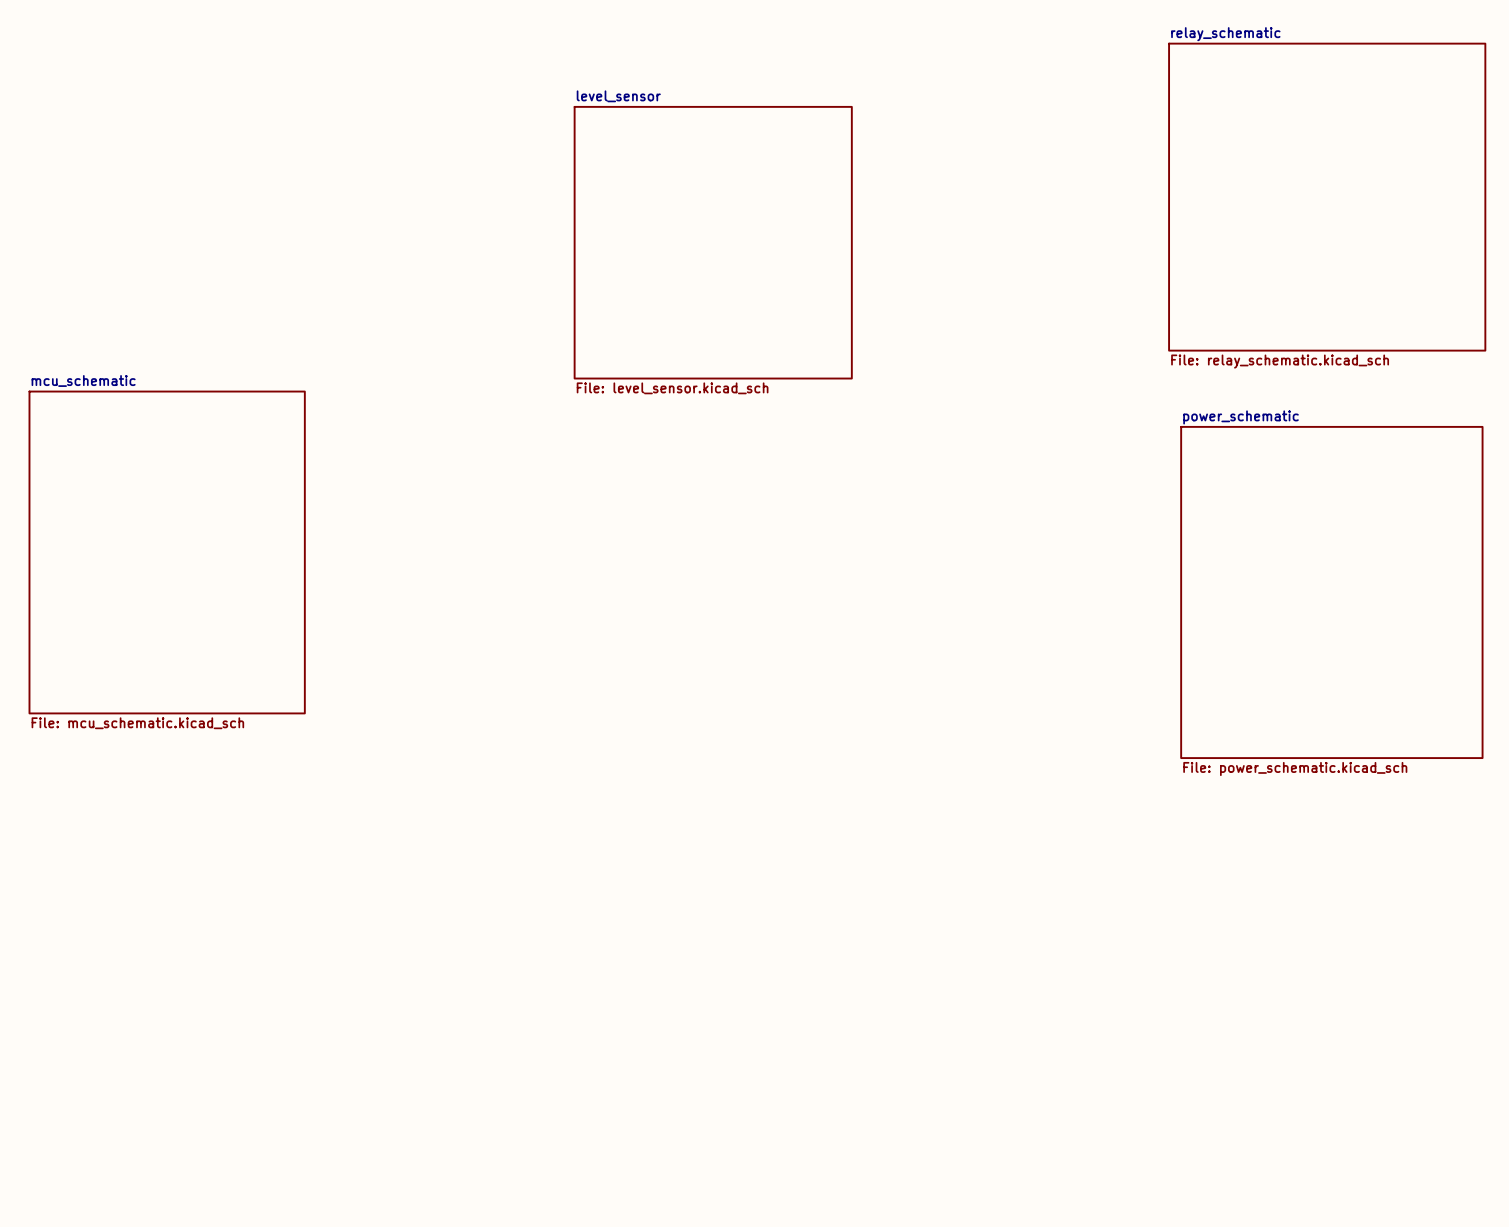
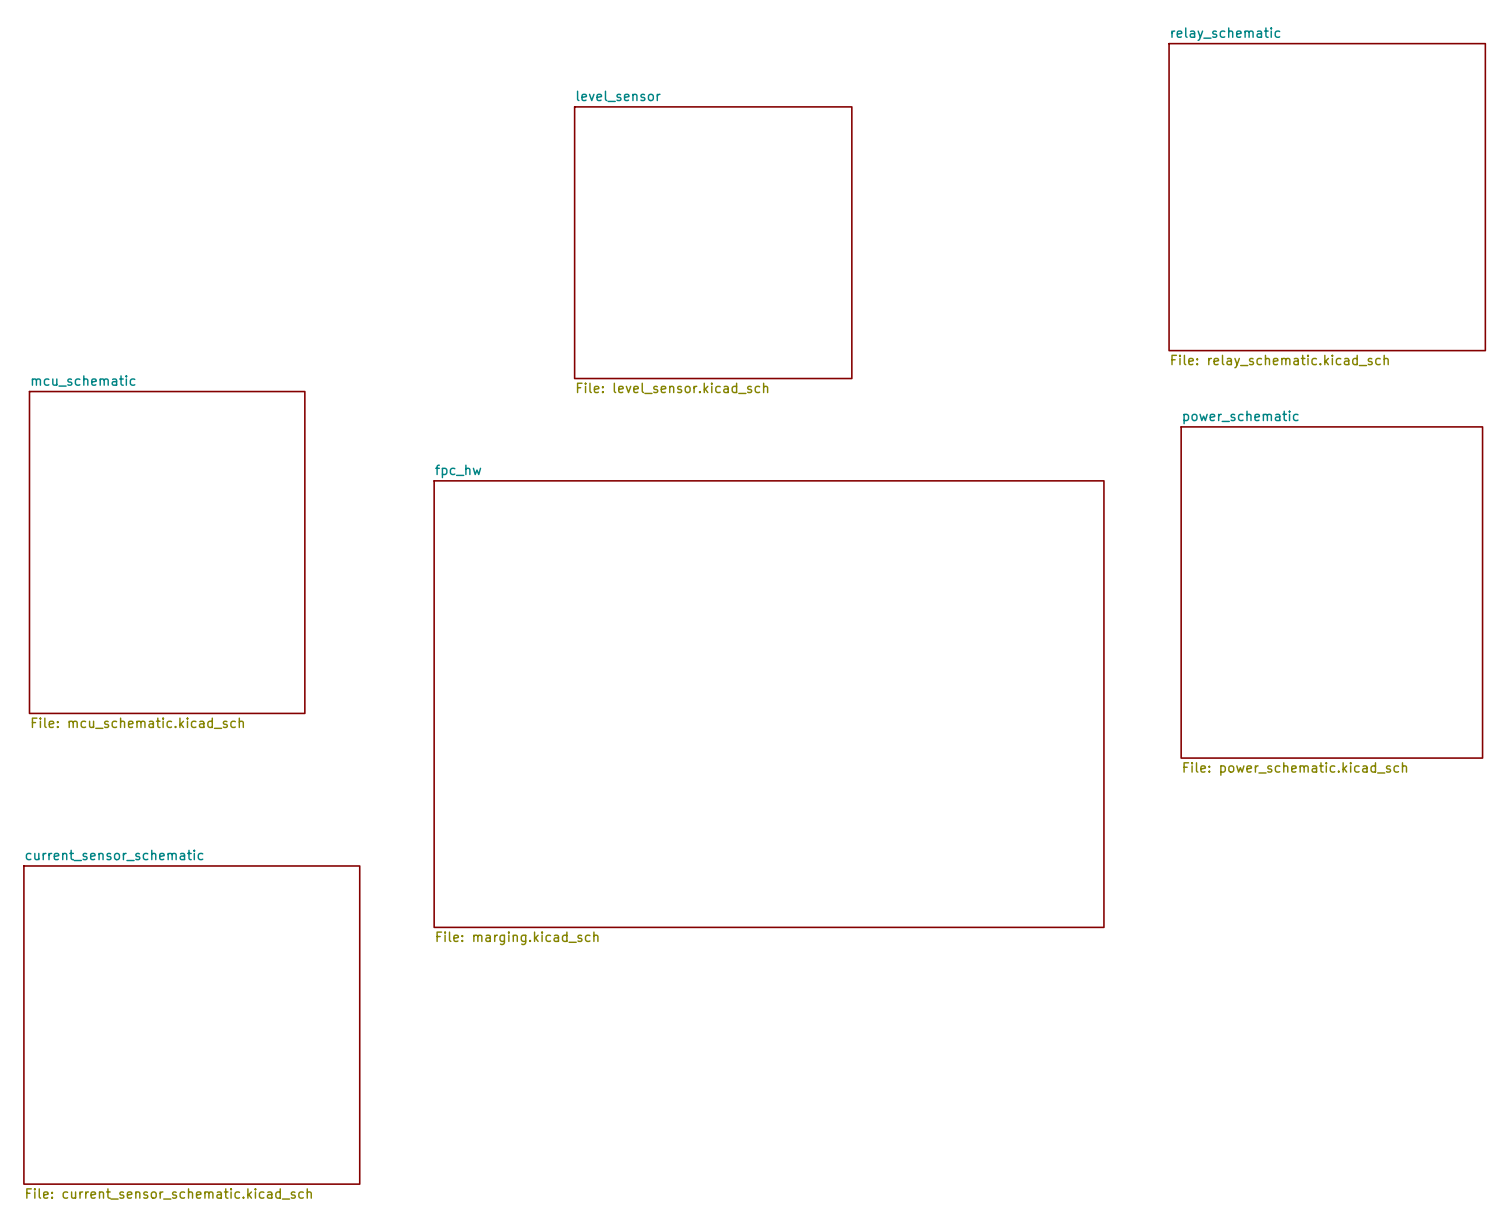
sheet fpc_hw: none -> File: marging.kicad_sch (769, 704)
sheet current_sensor_schematic: none -> File: current_sensor_schematic.kicad_sch (191, 1025)

